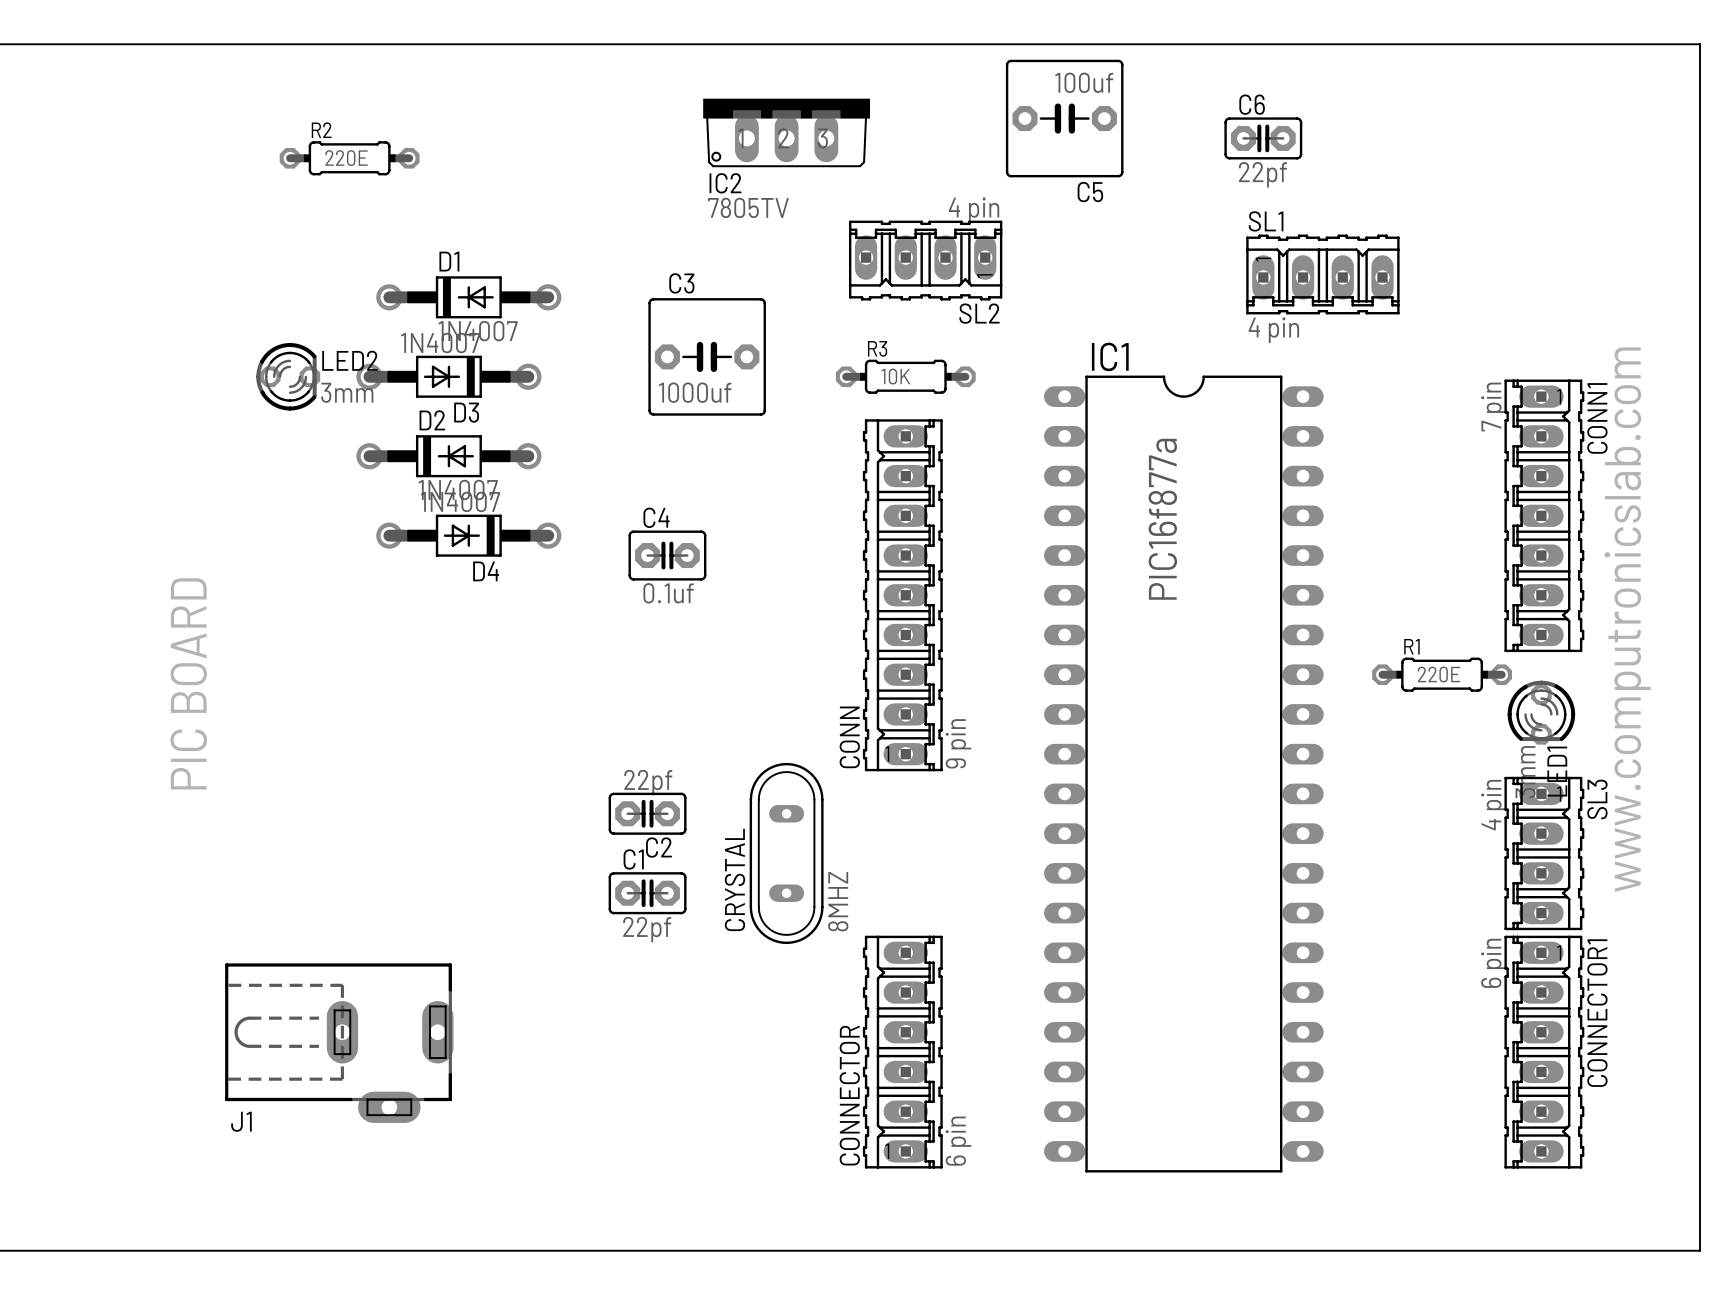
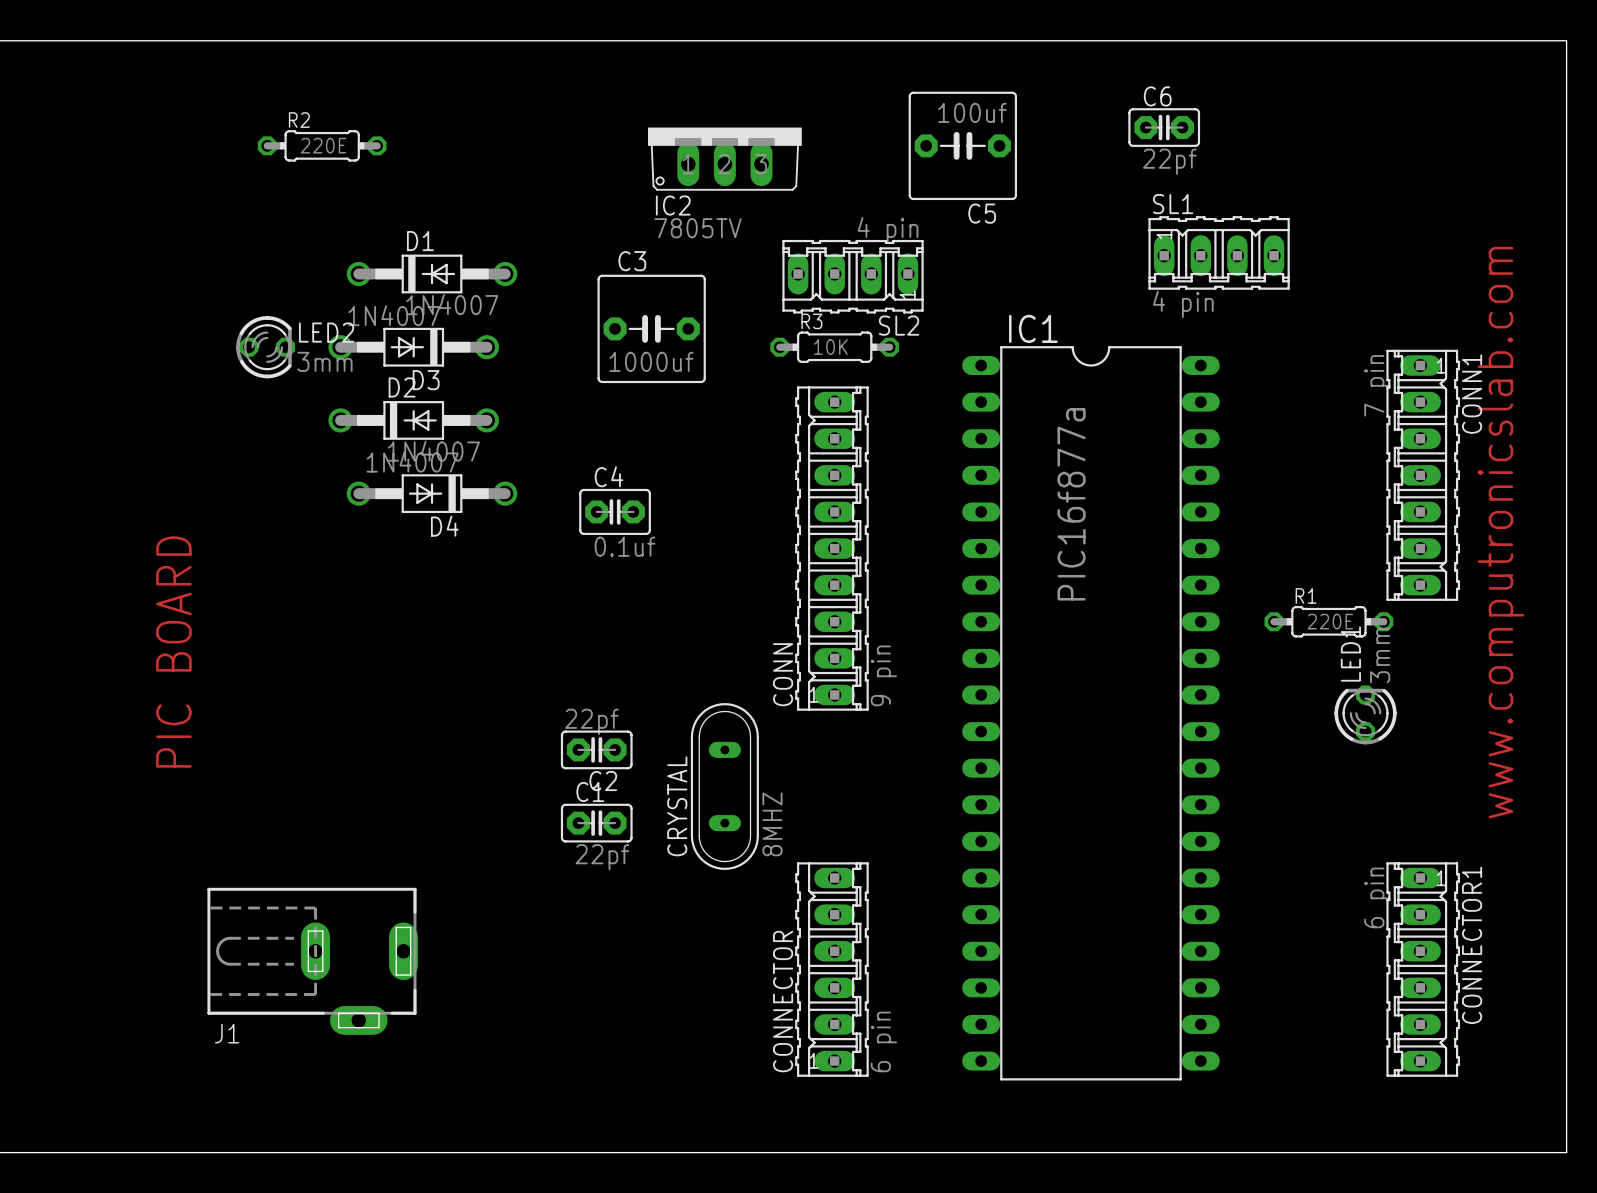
C5 position: (1064, 118) -> (962, 145)
IC2 position: (786, 132) -> (724, 159)
SL2 position: (925, 260) -> (853, 276)
LED1 rotation: 0° (1541, 712) -> 180° (1365, 714)
LED1 position: (1541, 712) -> (1365, 714)
SL3: 4 pin (1544, 853) -> none

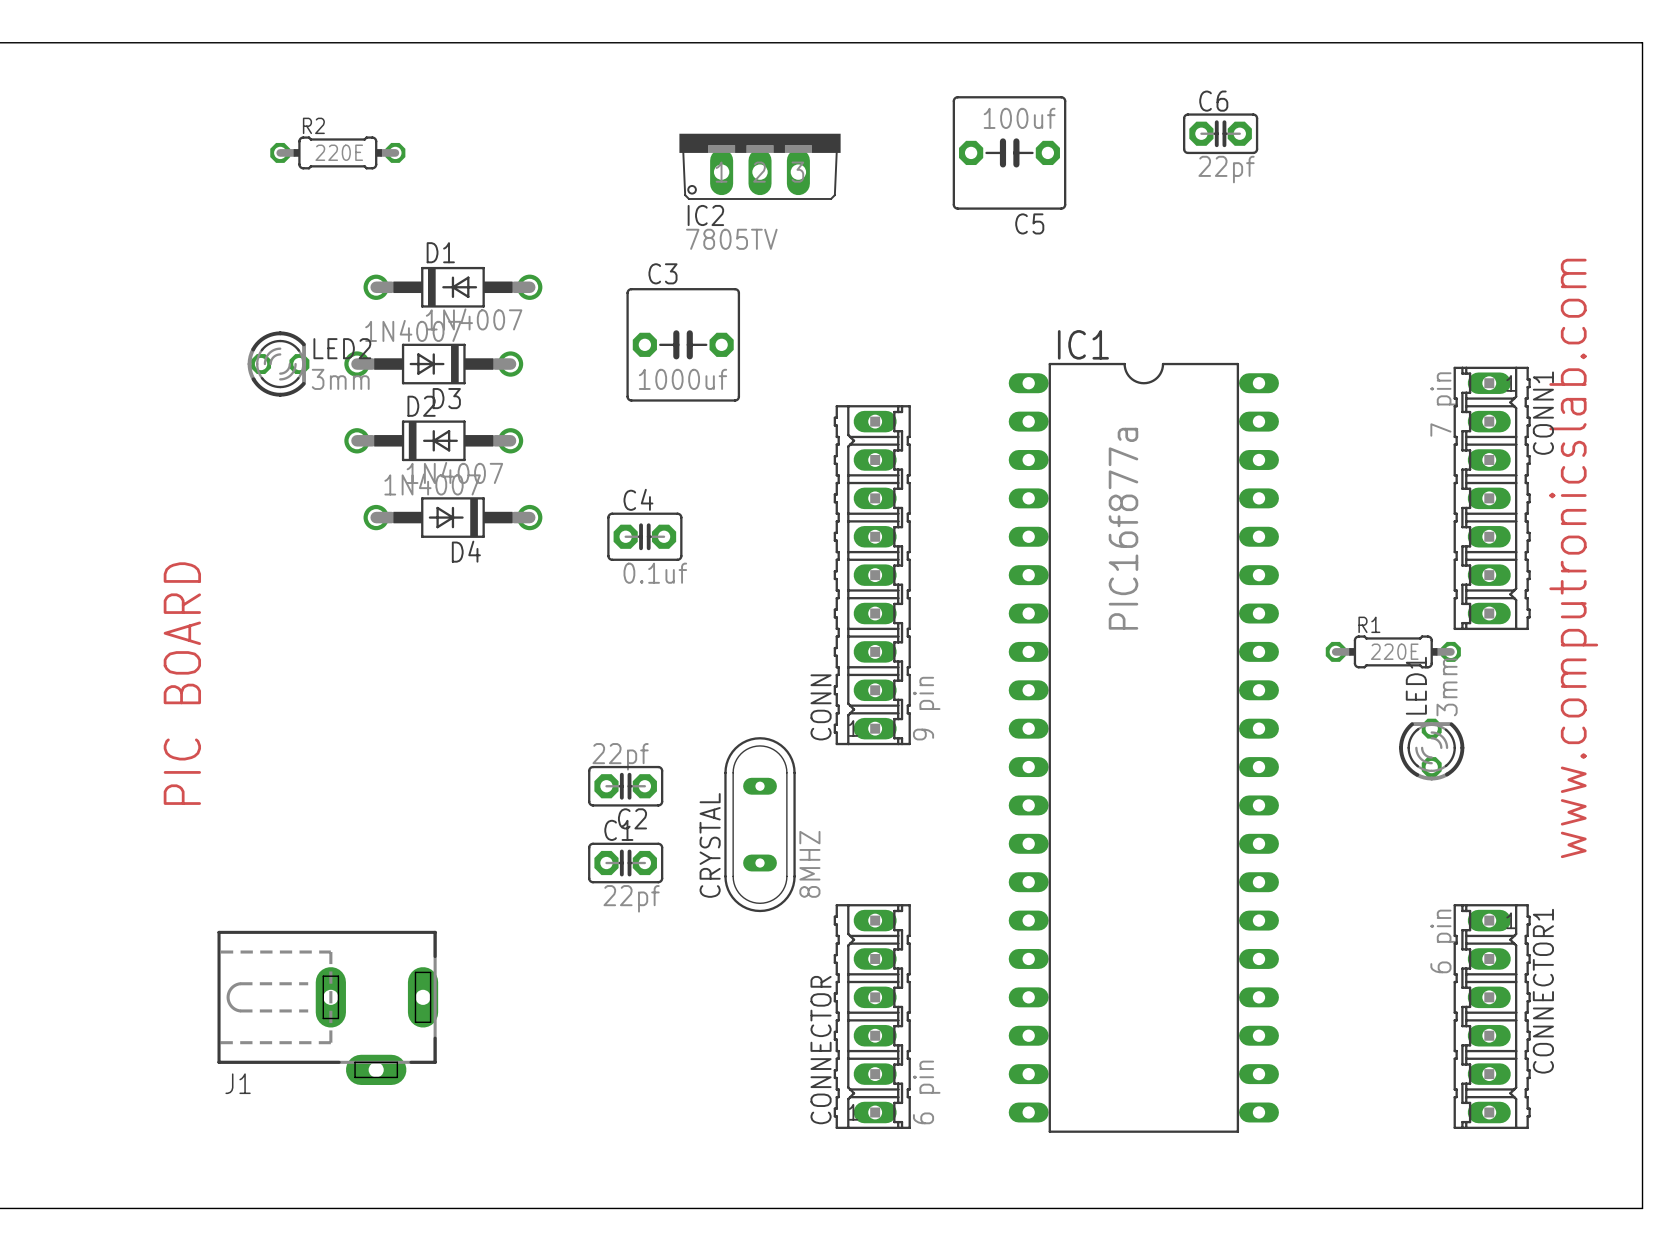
SL1: 4 pin (1219, 252) -> none
SL2: 4 pin (853, 276) -> none
R3: 10K (834, 347) -> none

